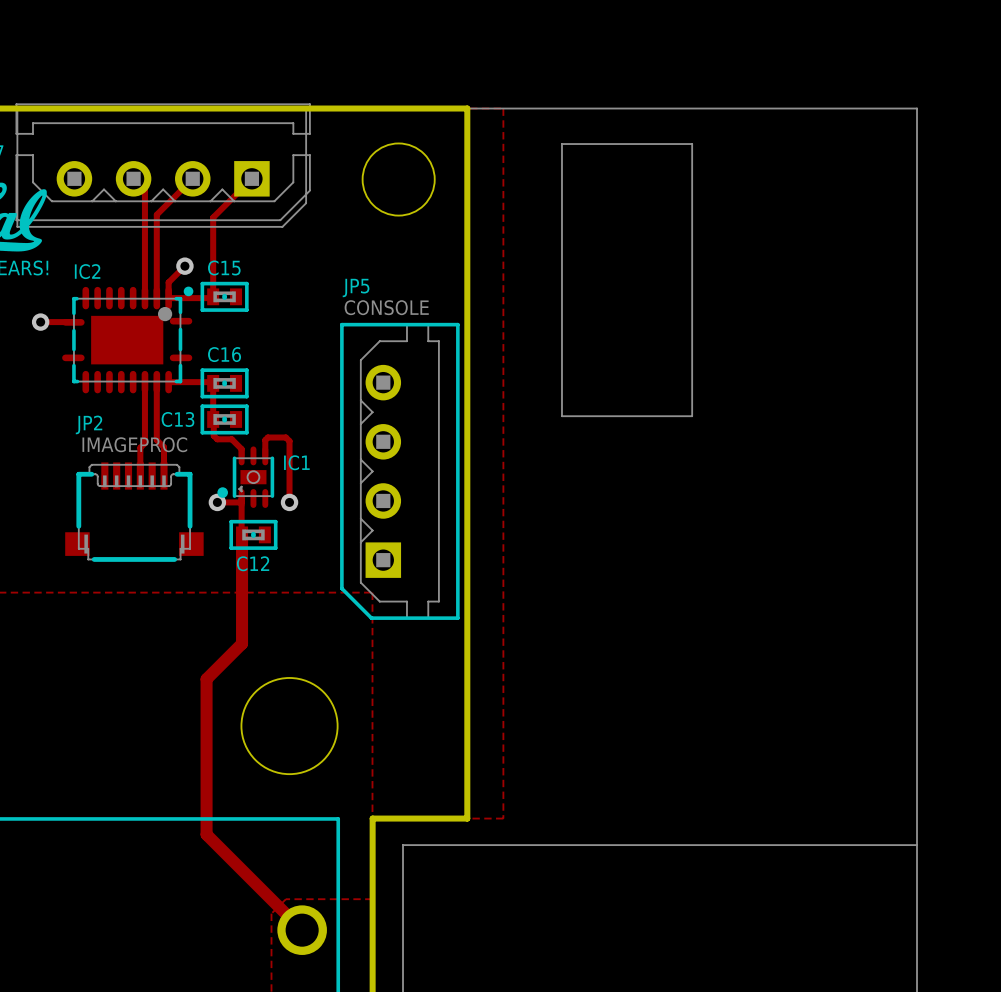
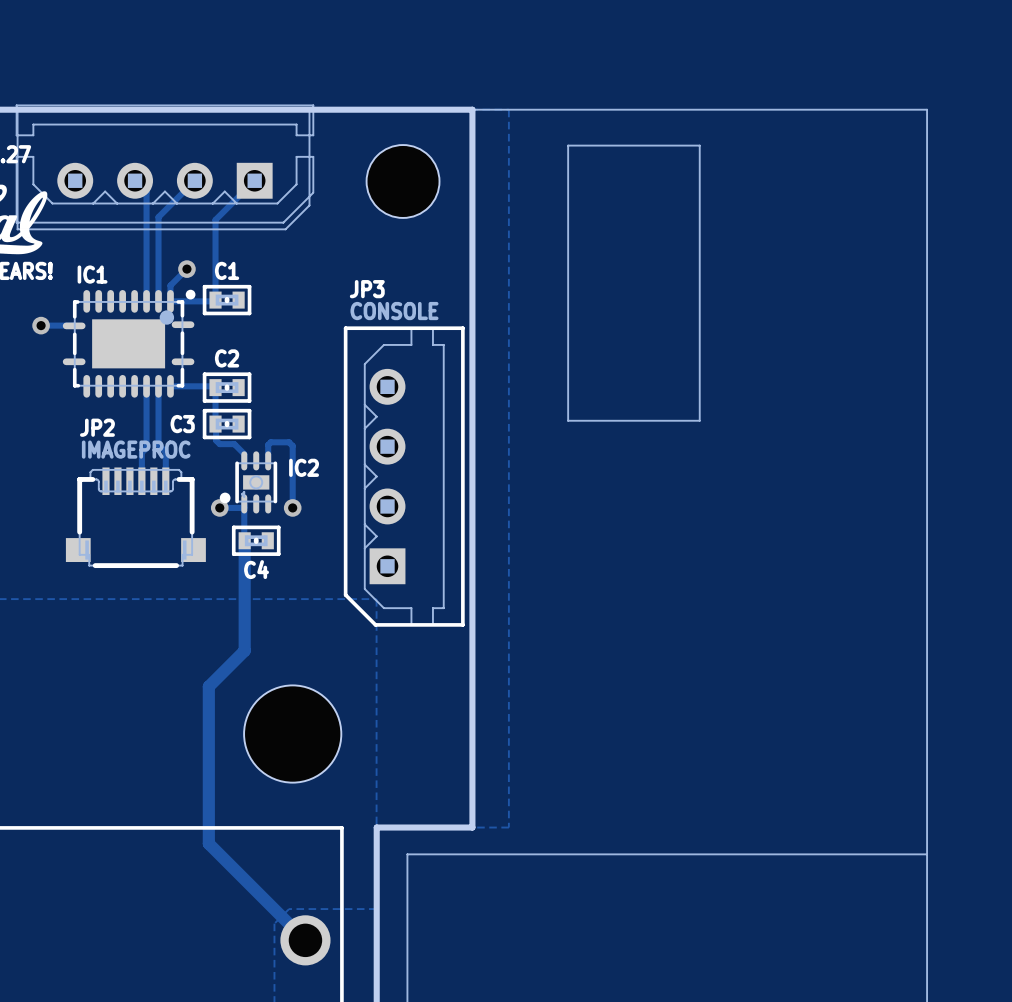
C15 name: C15 (224, 267) -> C1 (227, 270)
IC2 name: IC2 (87, 271) -> IC1 (92, 274)
JP5 name: JP5 (356, 287) -> JP3 (367, 289)
C16 name: C16 (224, 354) -> C2 (227, 358)
C13 name: C13 (177, 419) -> C3 (182, 424)
IC1 name: IC1 (296, 462) -> IC2 (304, 467)
C12 name: C12 (253, 563) -> C4 (256, 569)

